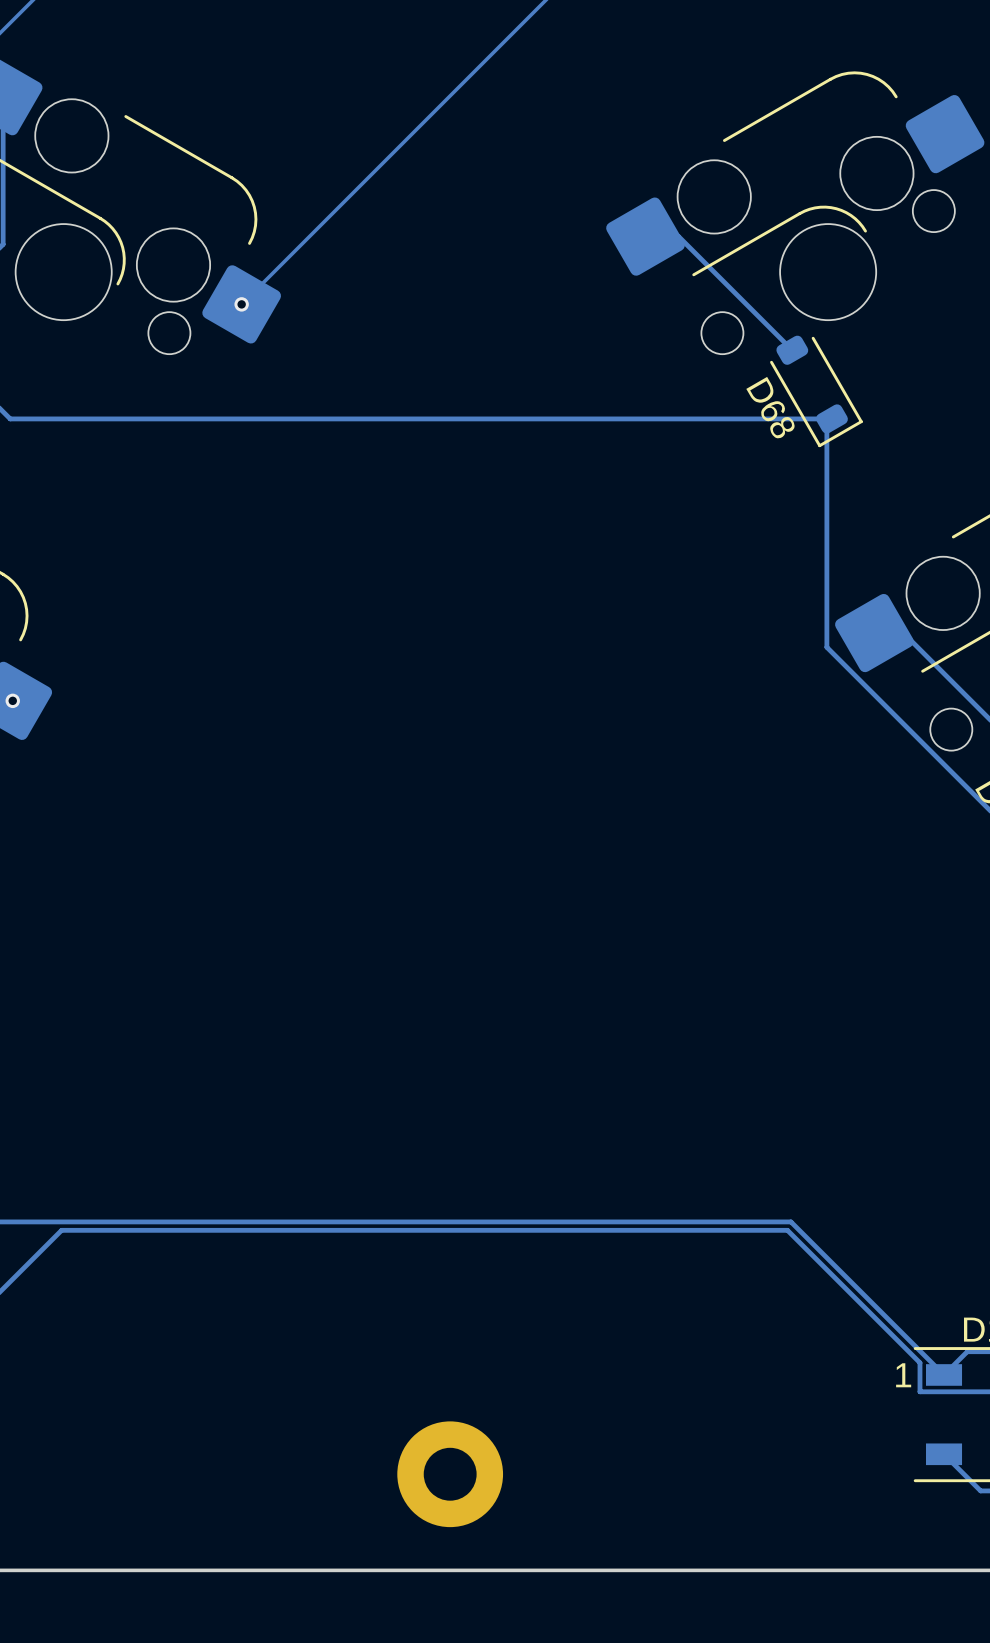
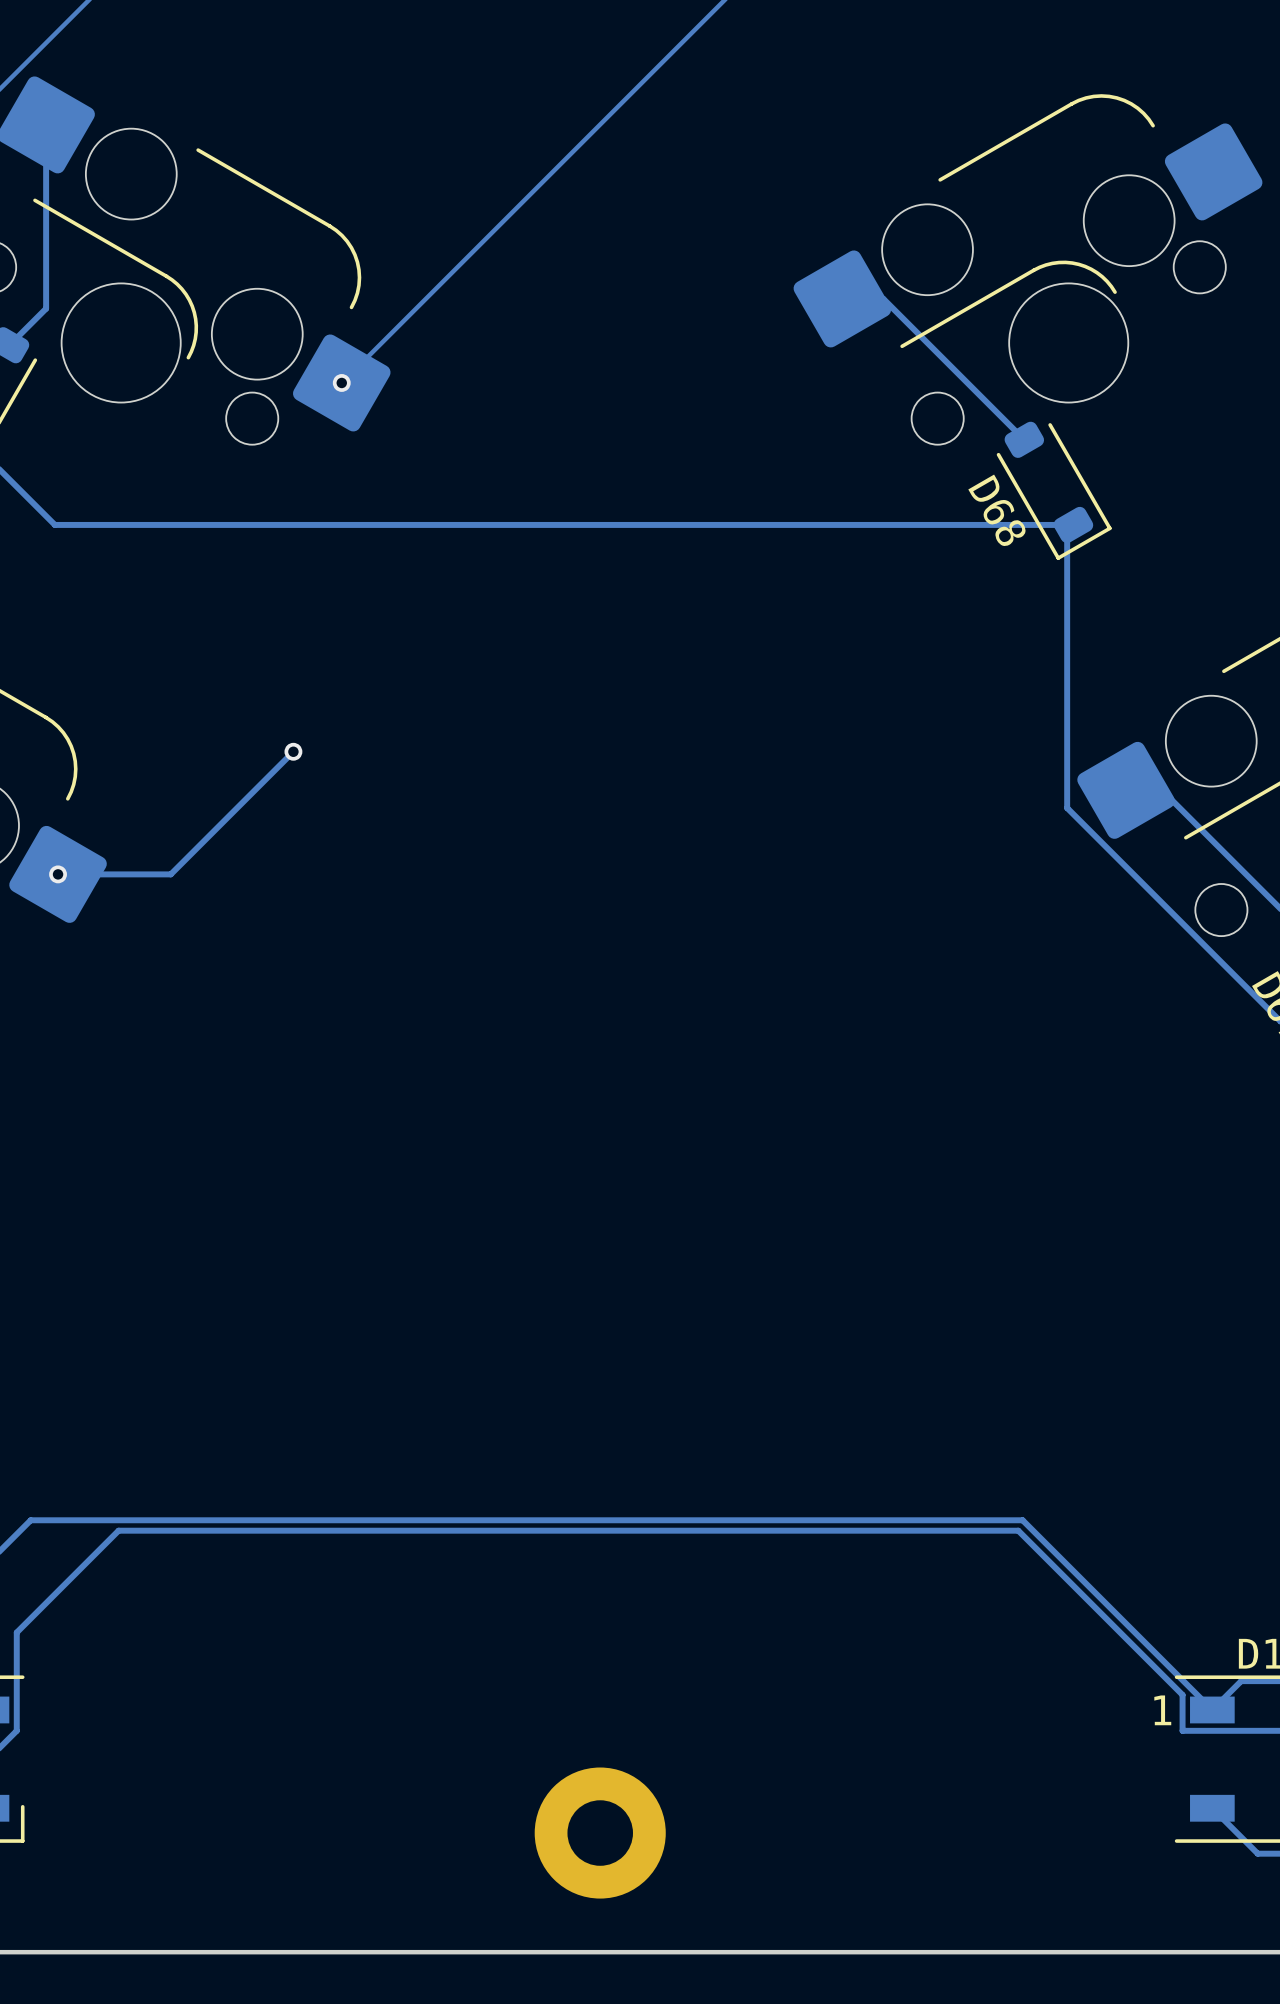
track: none -> (293, 751) (170, 874) (58, 874)
via: none -> (293, 751)

